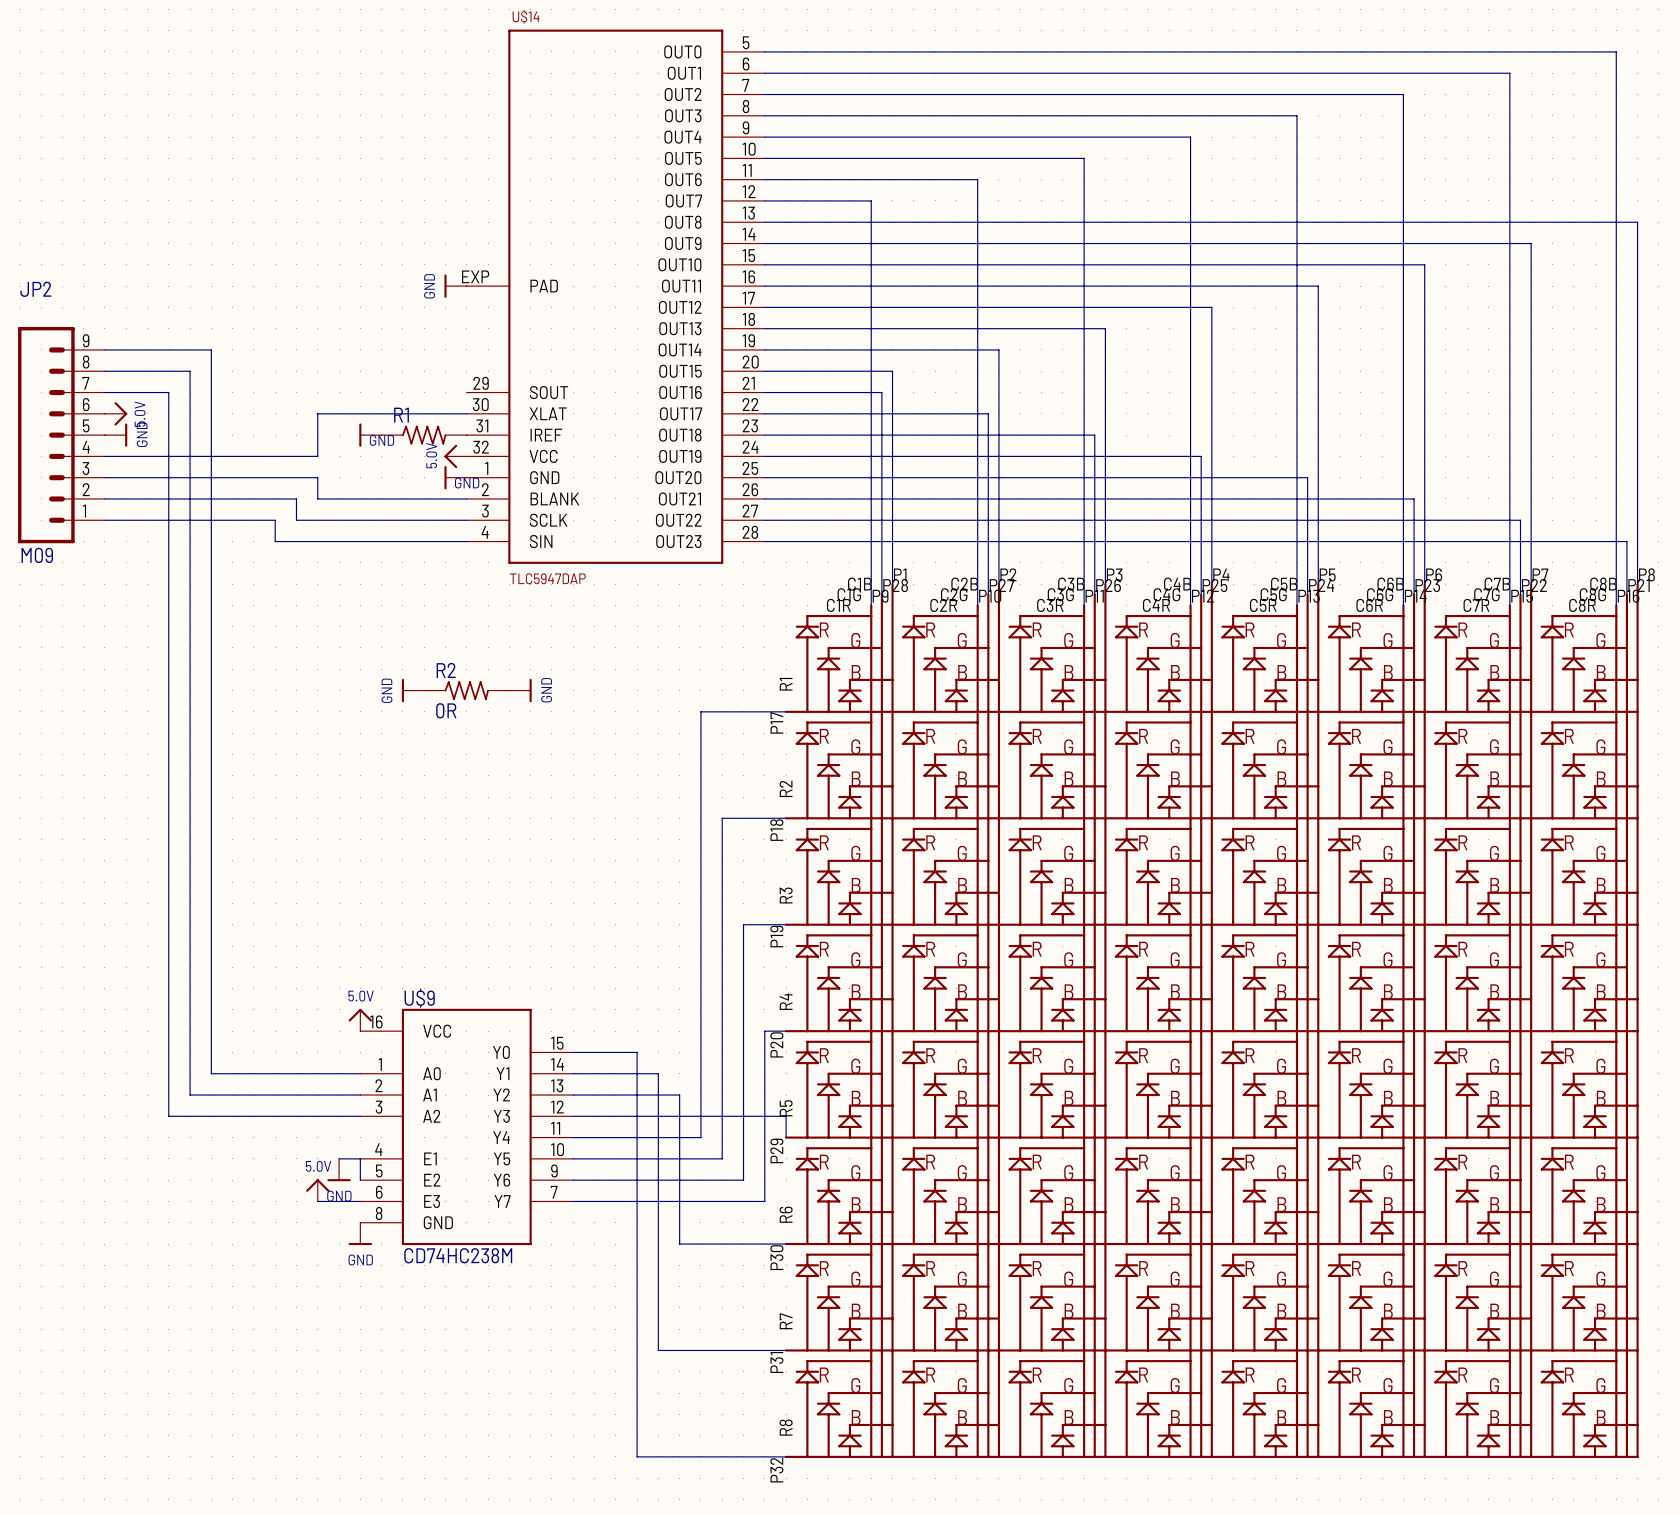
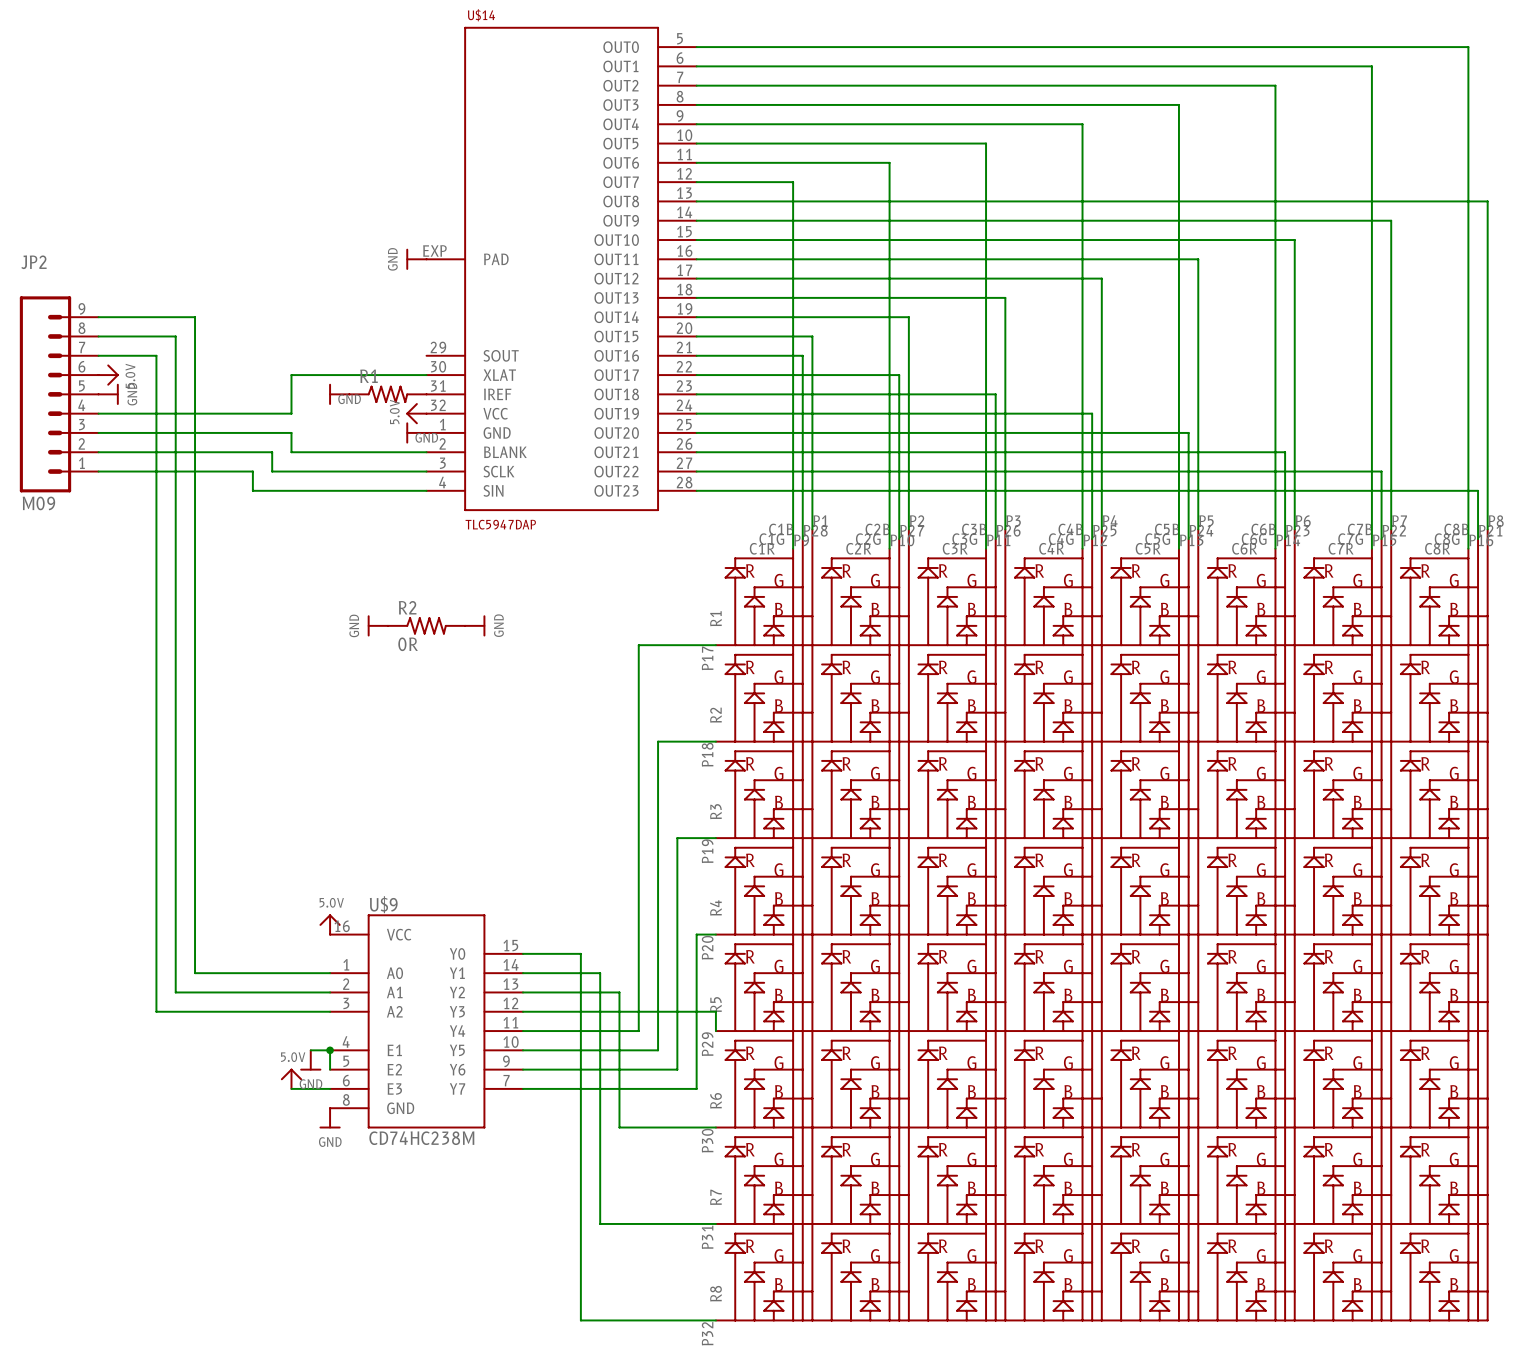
junction: none -> (330, 1050)

